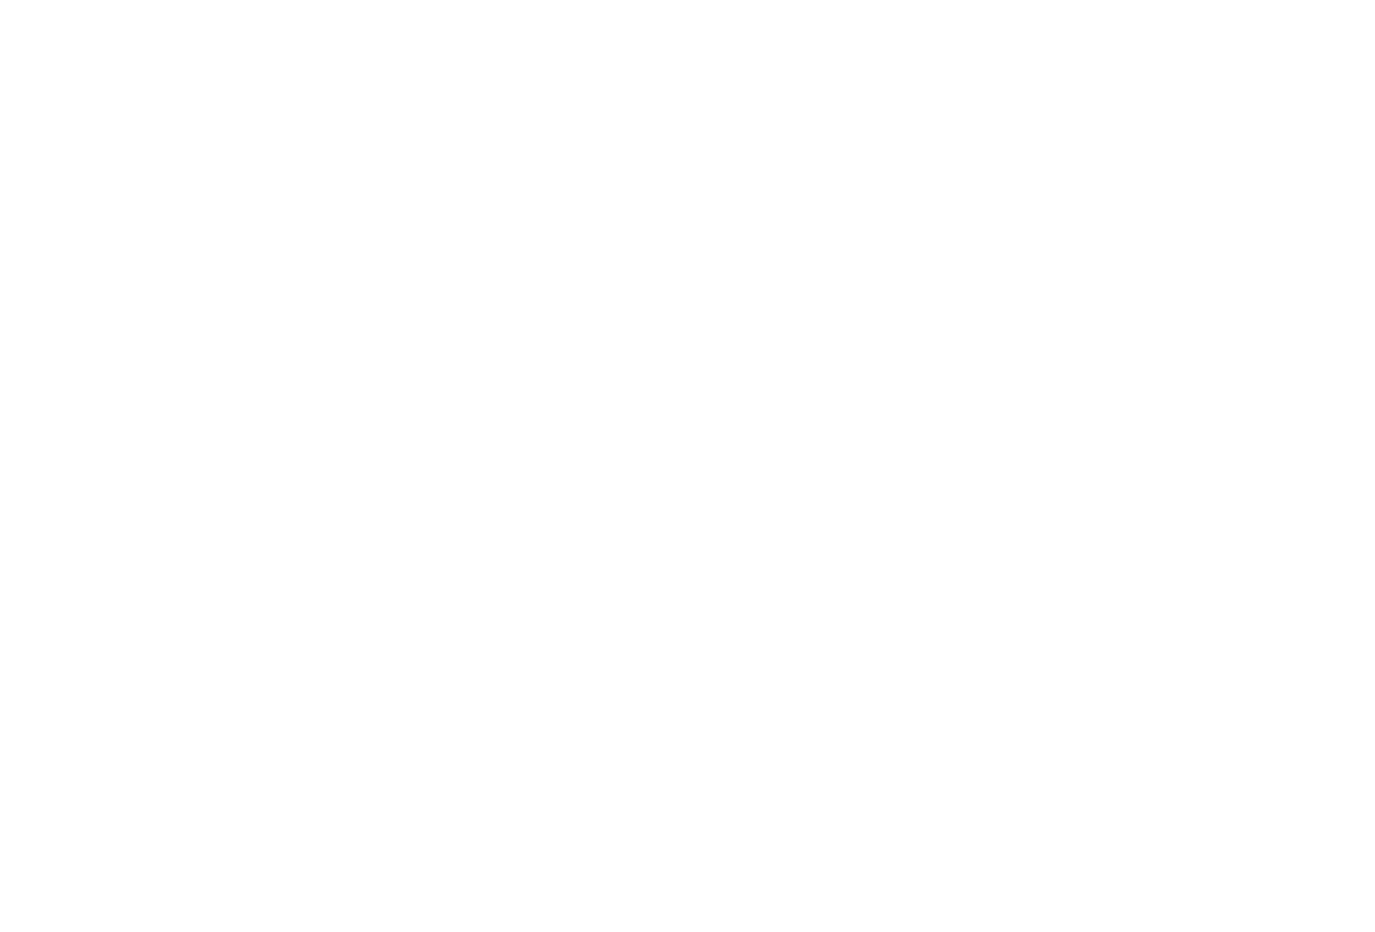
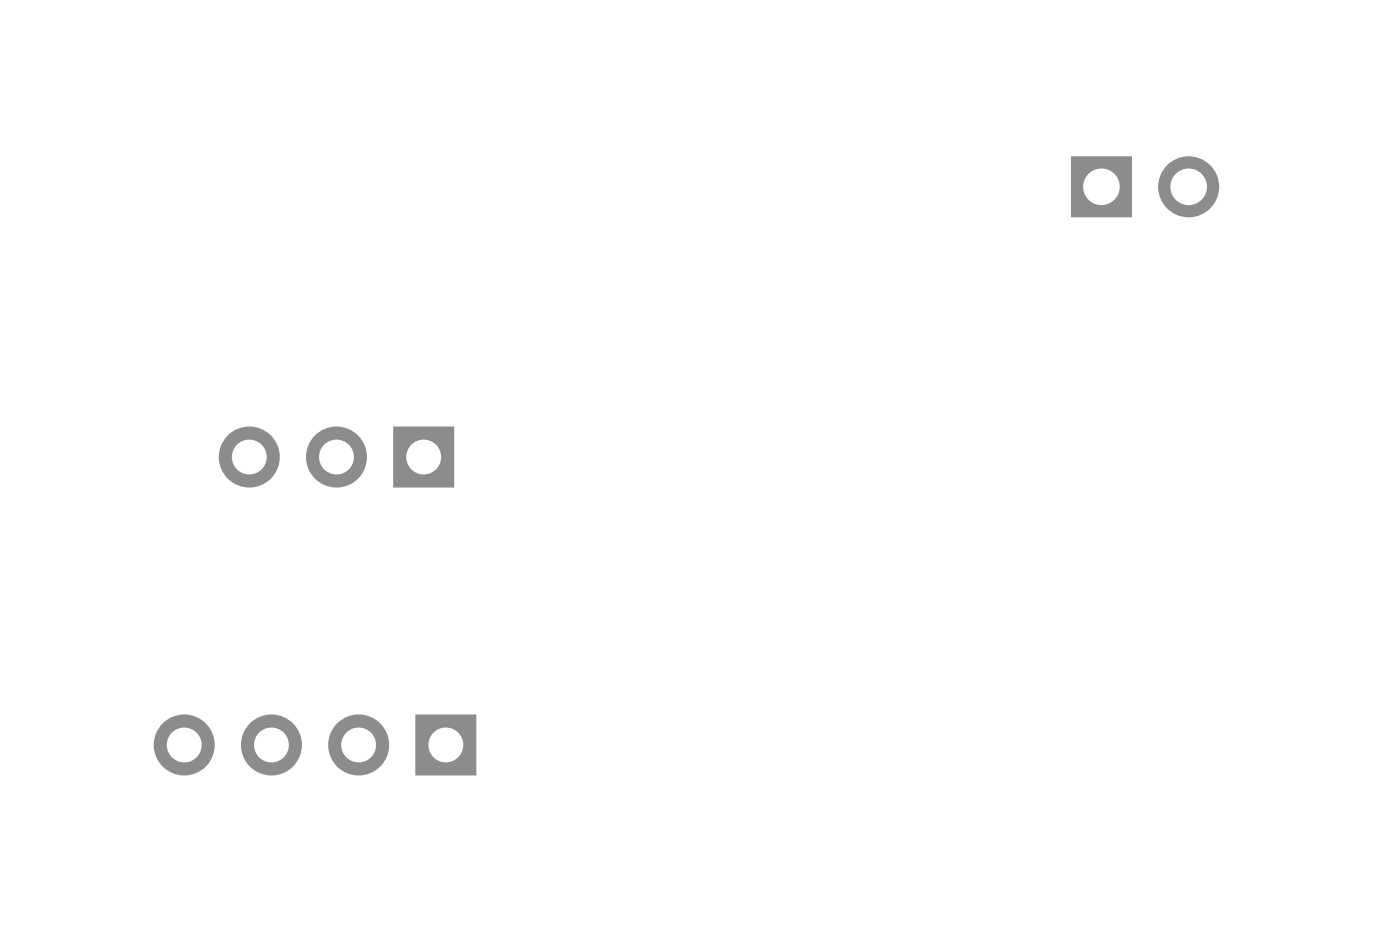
part: none -> (1145, 186)
part: none -> (336, 457)
part: none -> (315, 744)

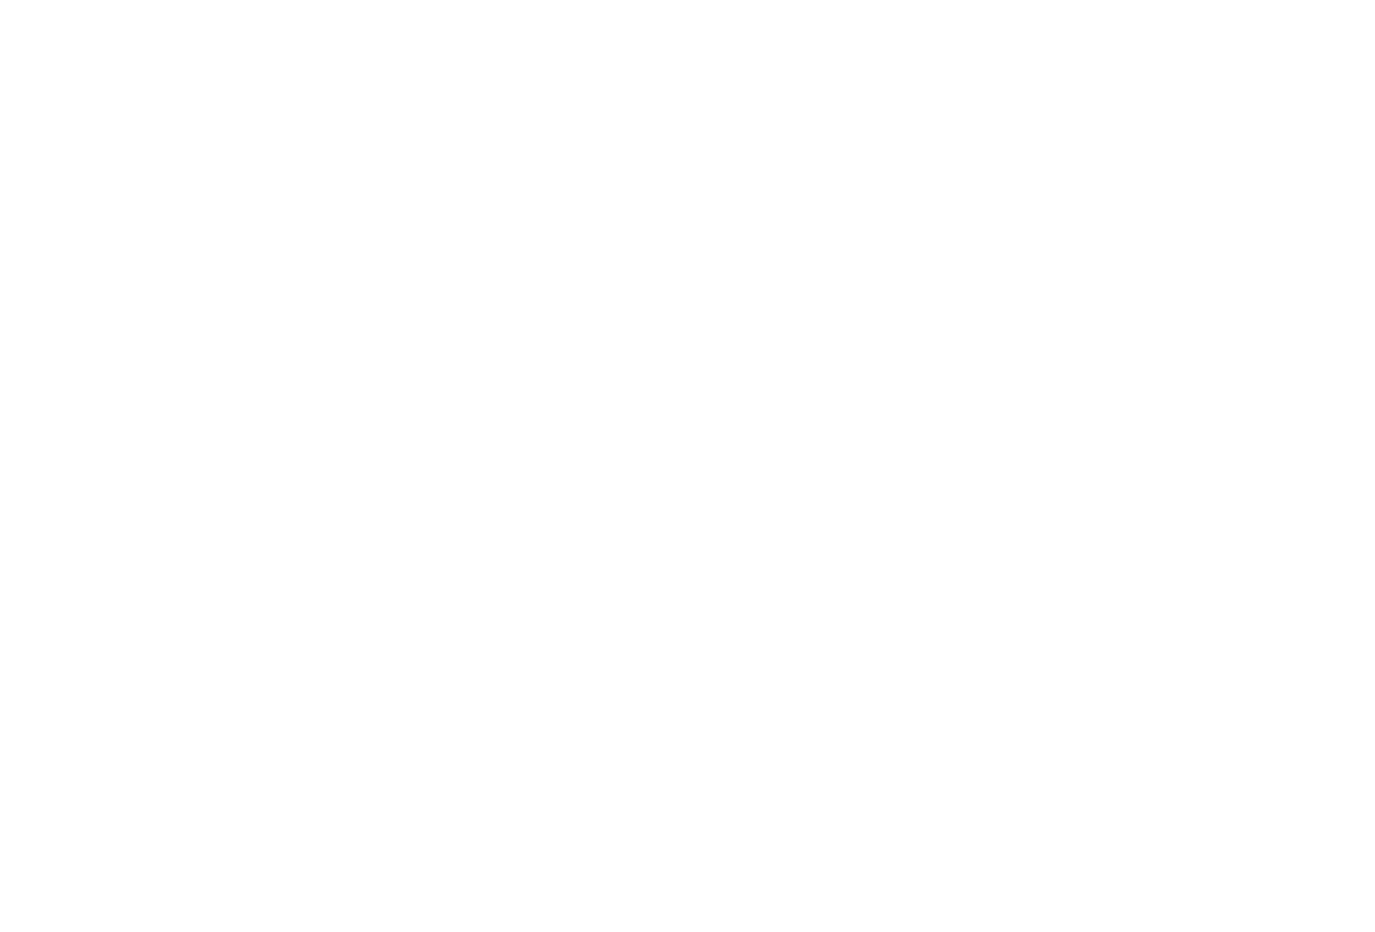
part: (1145, 186) -> none
part: (336, 457) -> none
part: (315, 744) -> none

